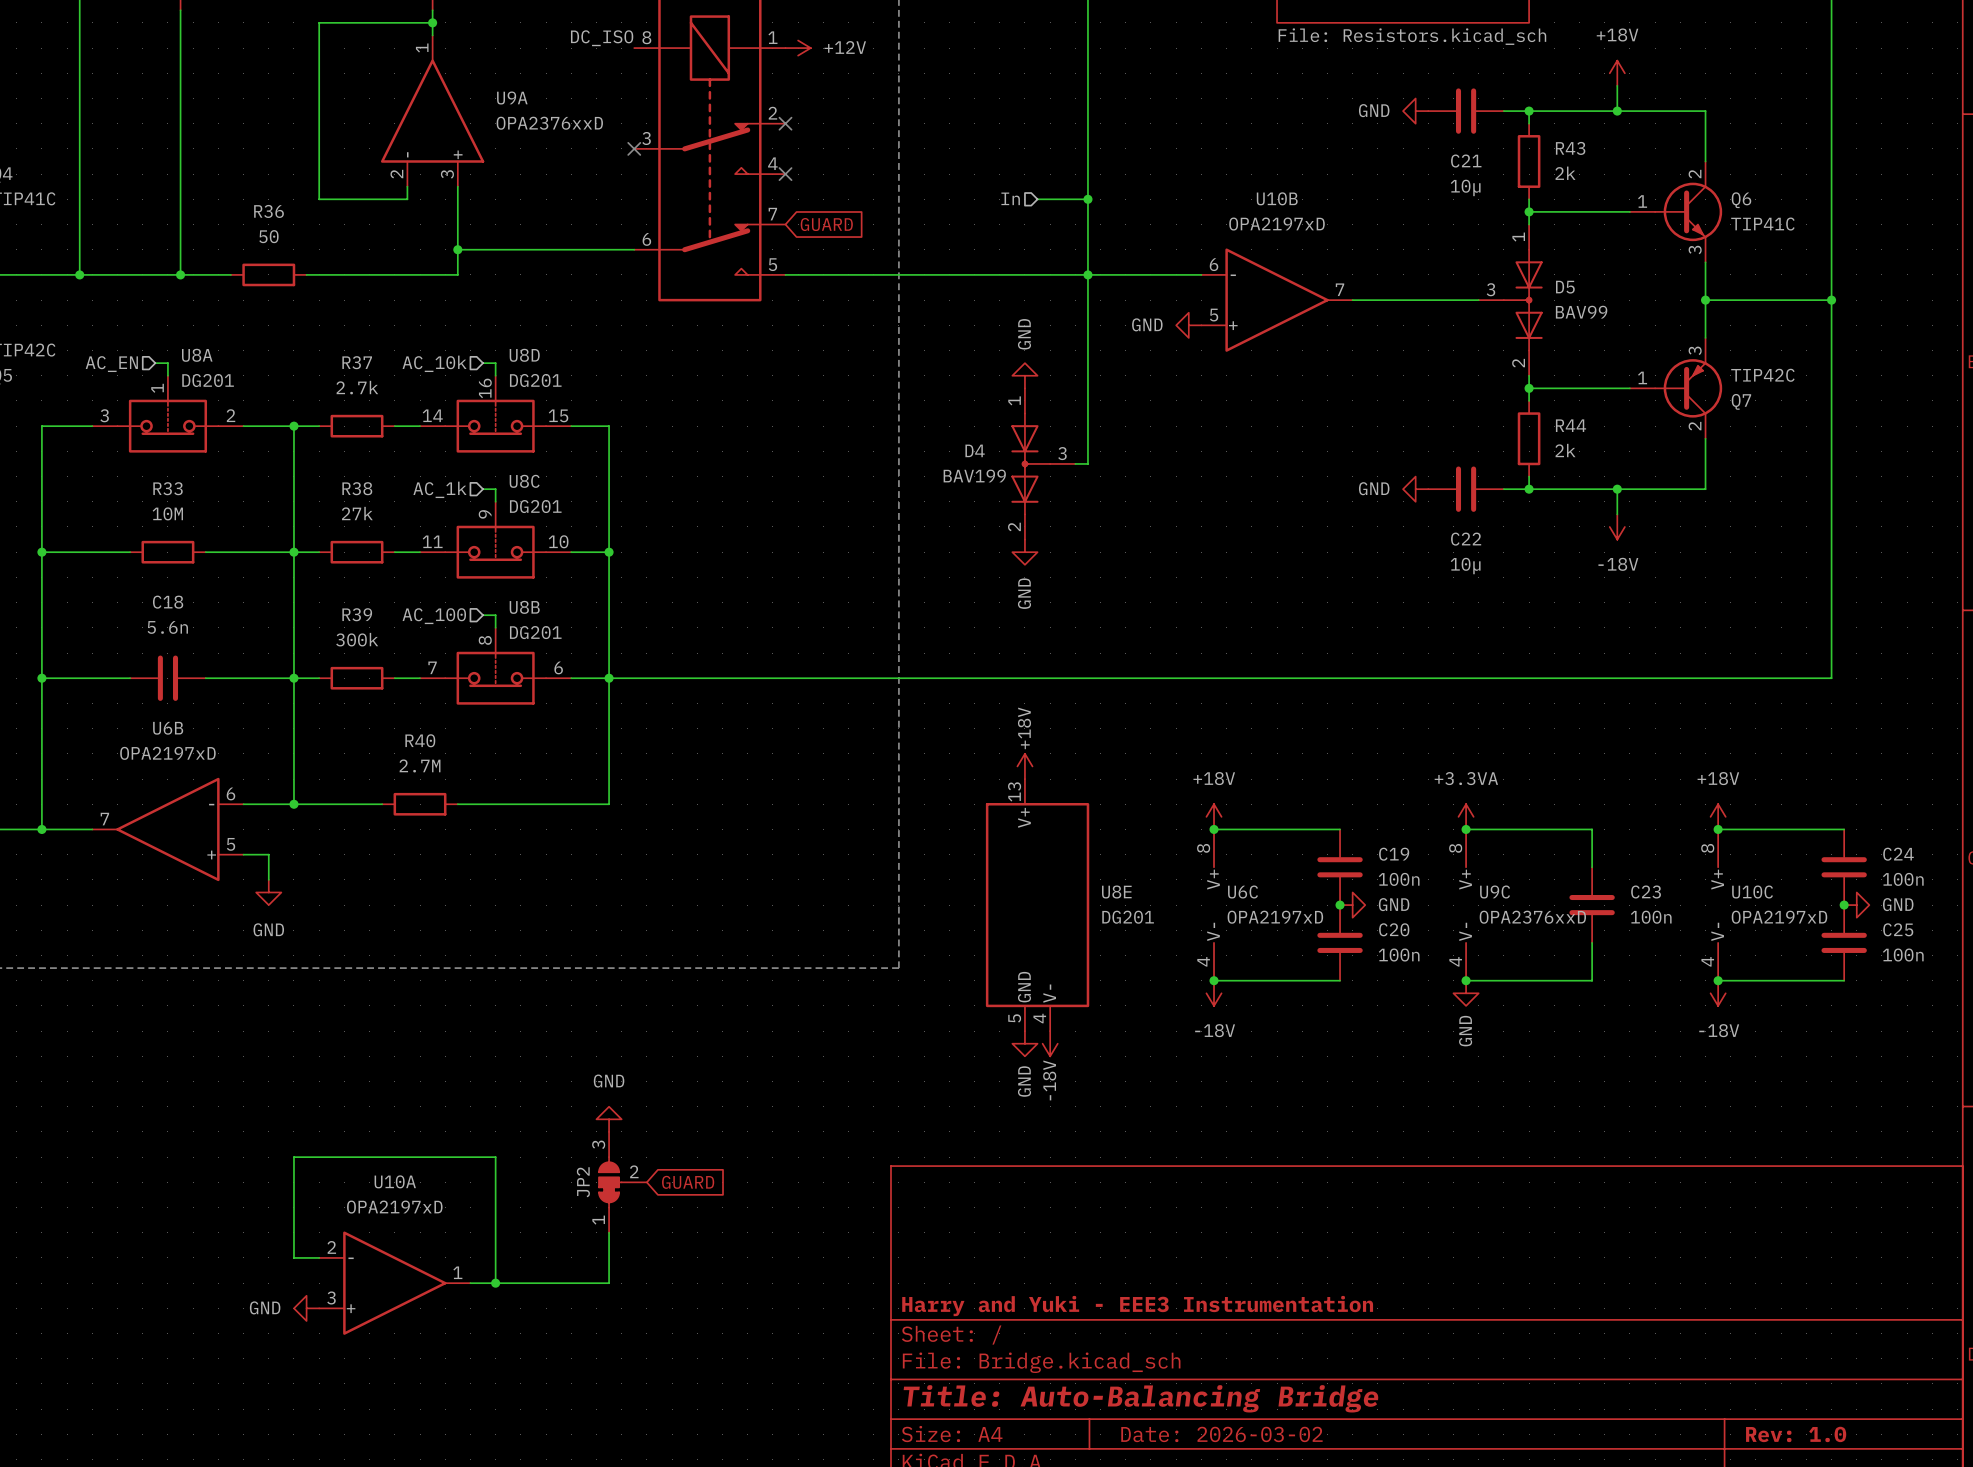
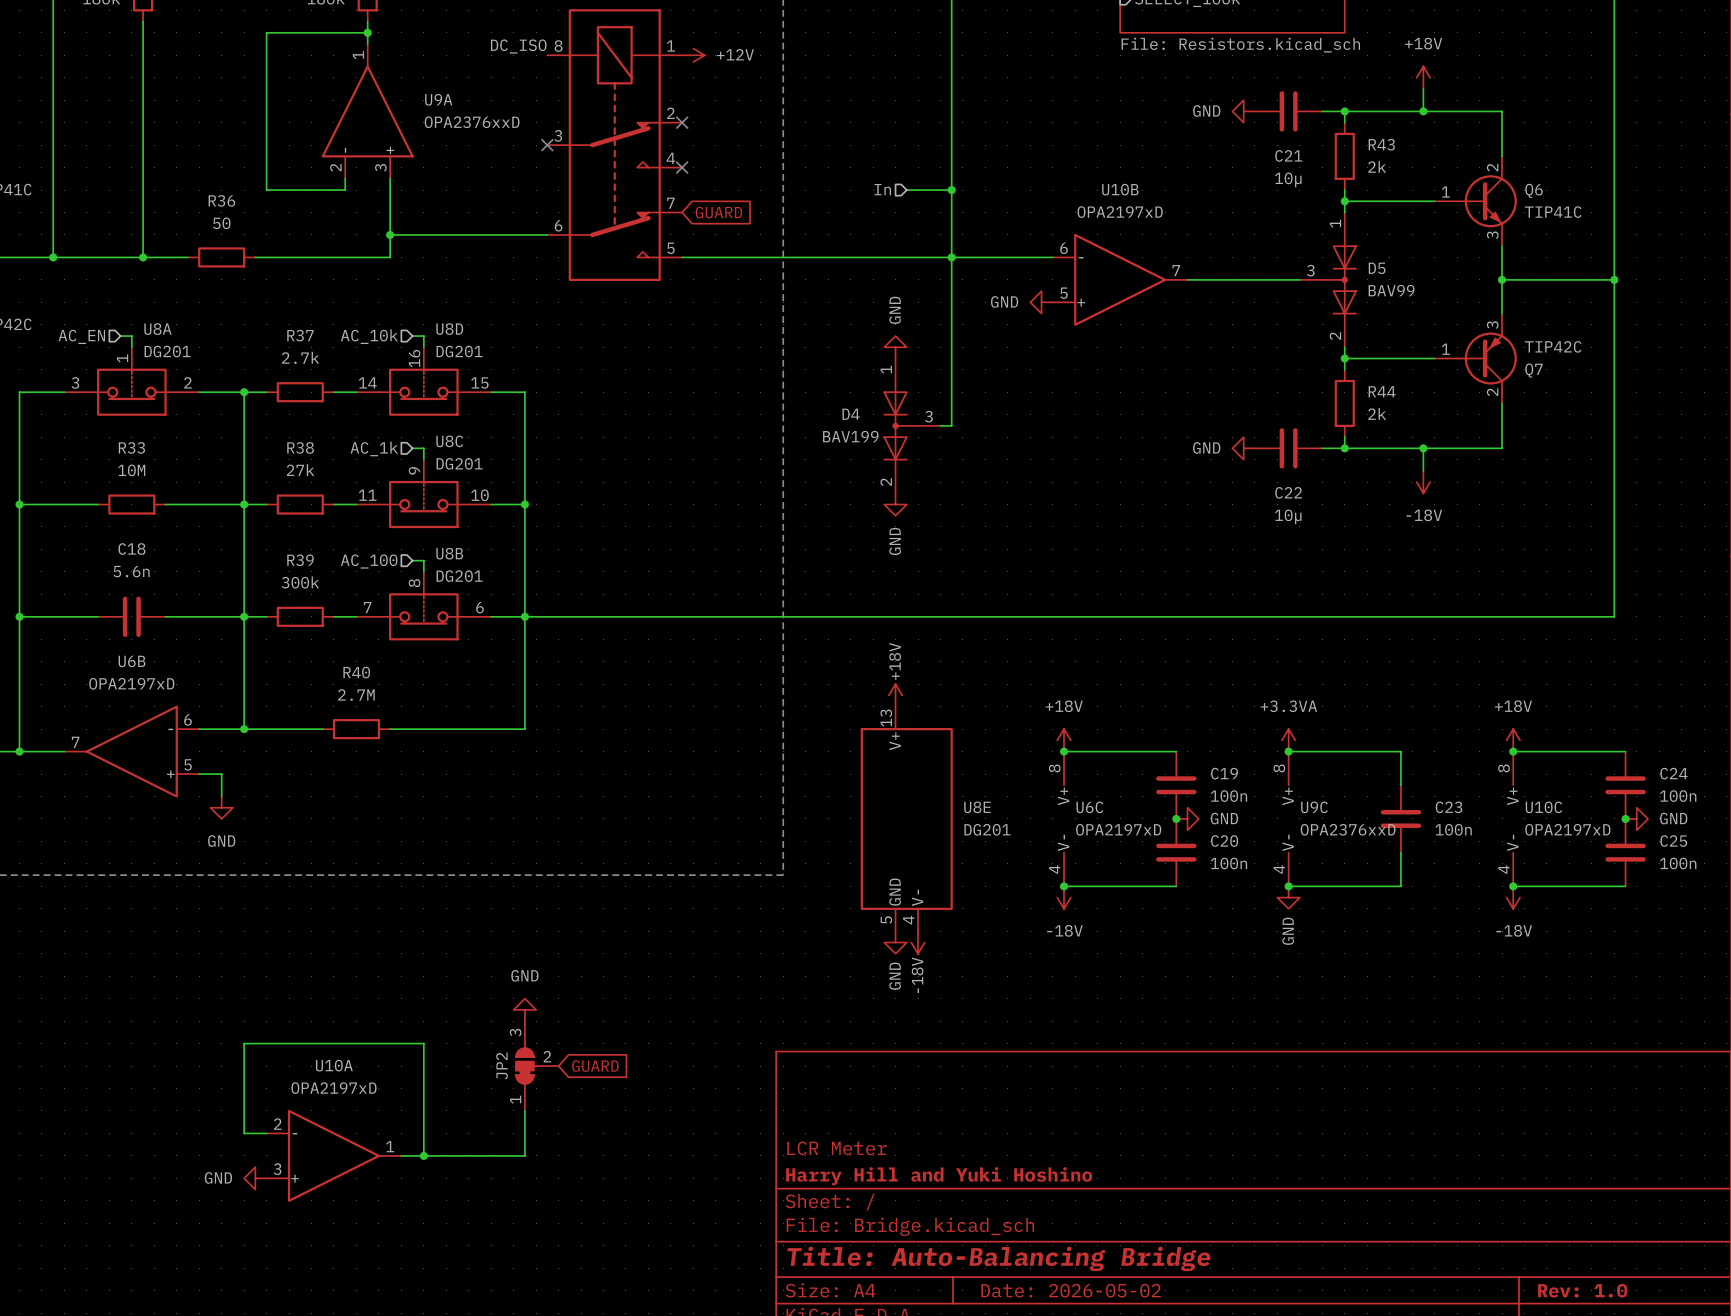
title block: none -> LCR Meter (837, 1148)
title block: Harry and Yuki - EEE3 Instrumentation (1137, 1306) -> Harry Hill and Yuki Hoshino (939, 1176)
title block: Date: 2026-03-02 (1221, 1434) -> Date: 2026-05-02 (1071, 1290)

